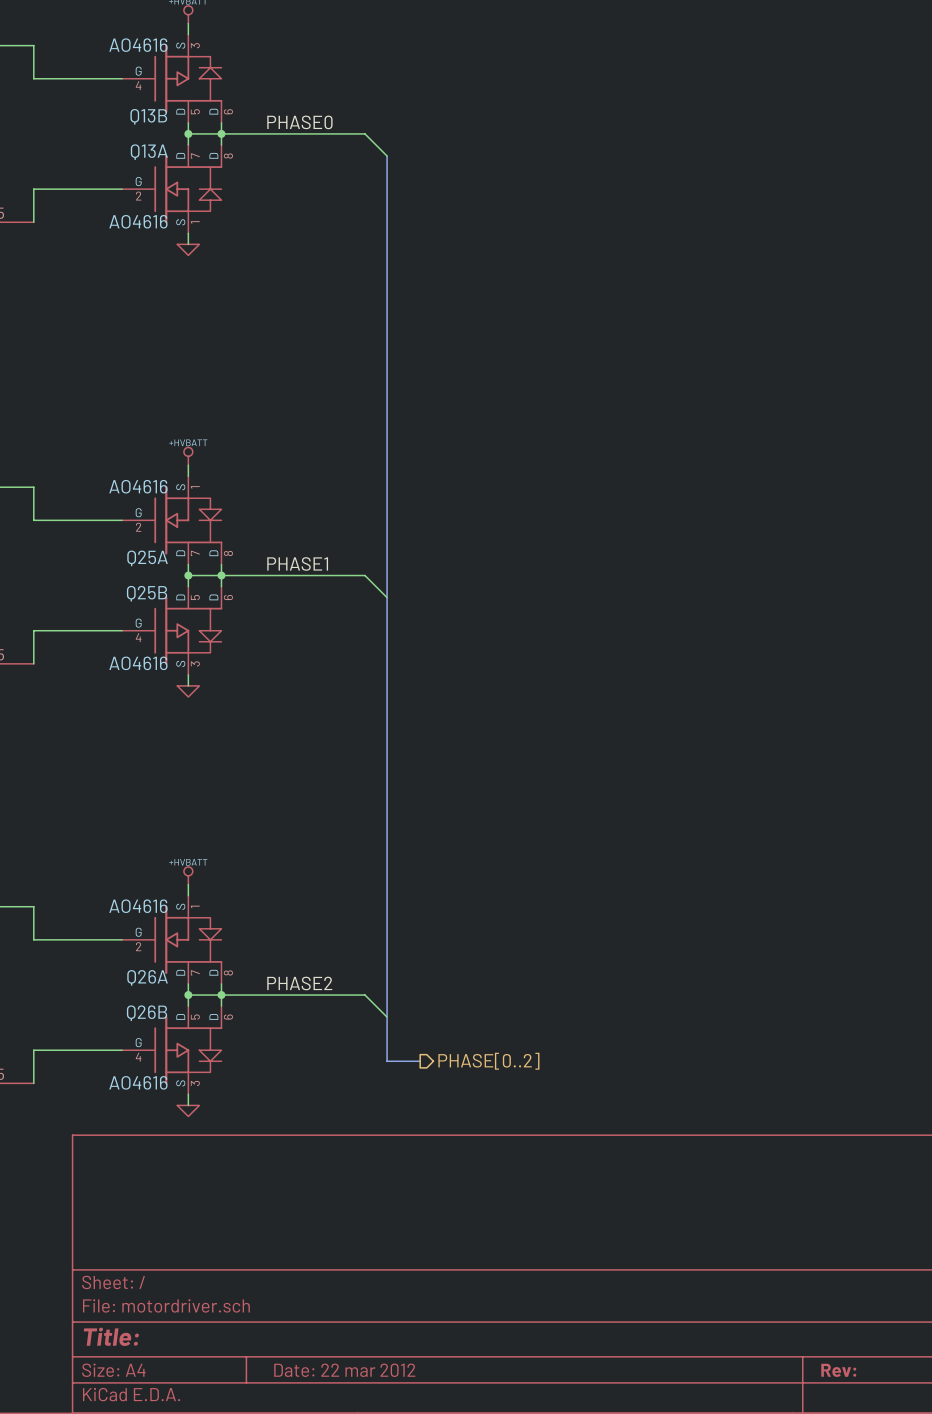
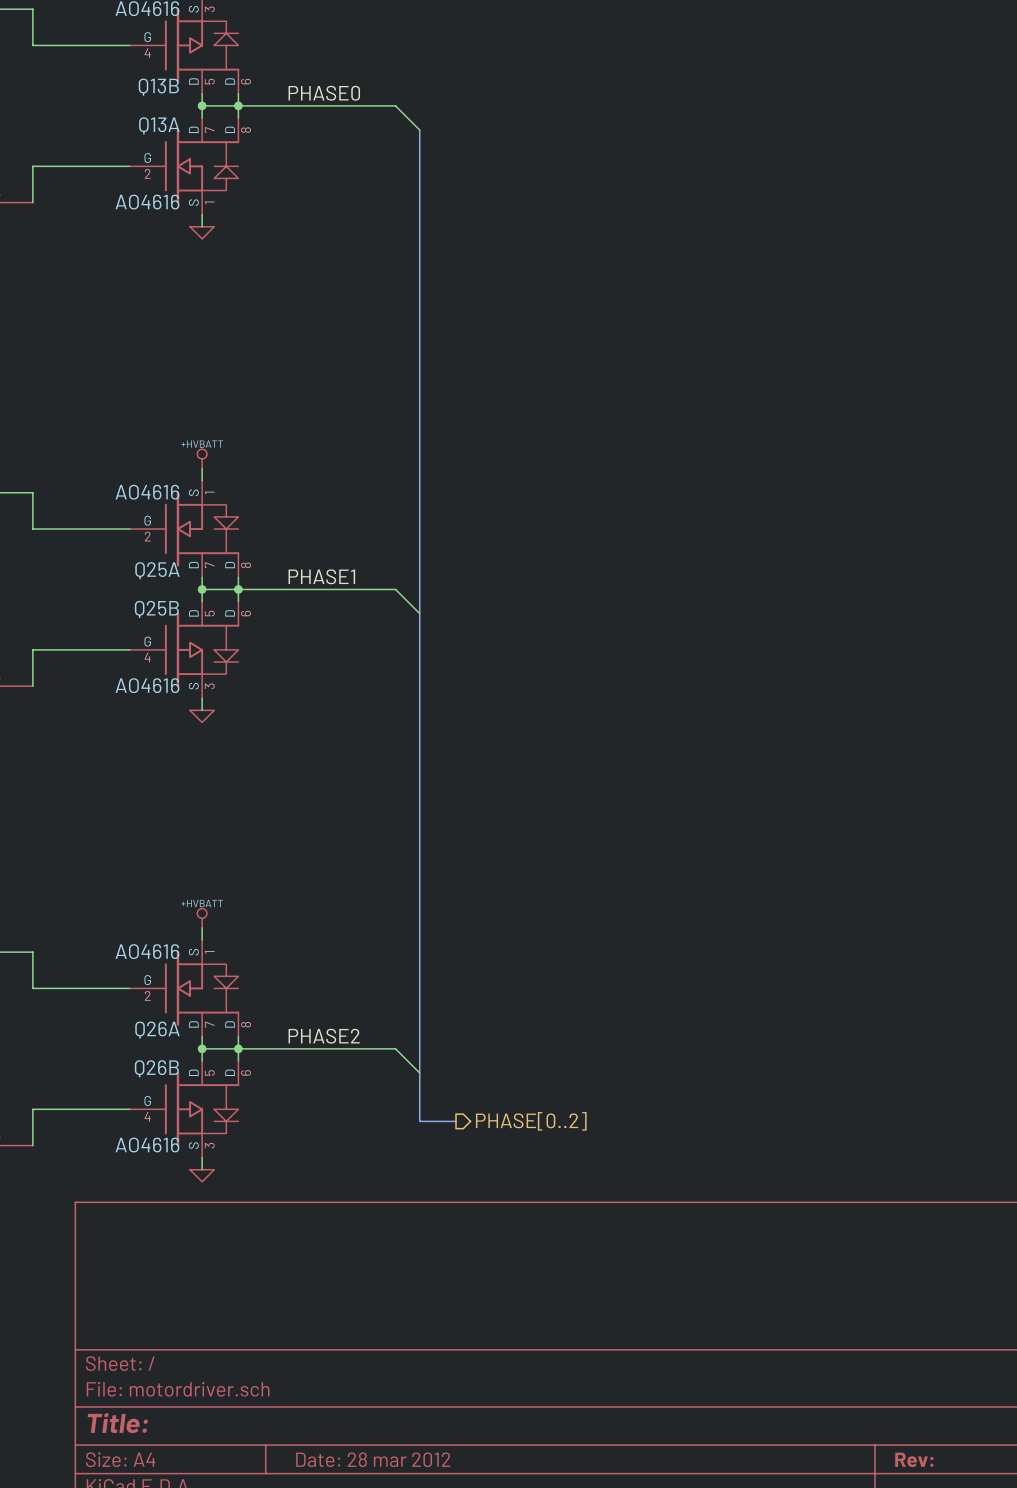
title block: Date: 22 mar 2012 (344, 1370) -> Date: 28 mar 2012 (373, 1459)

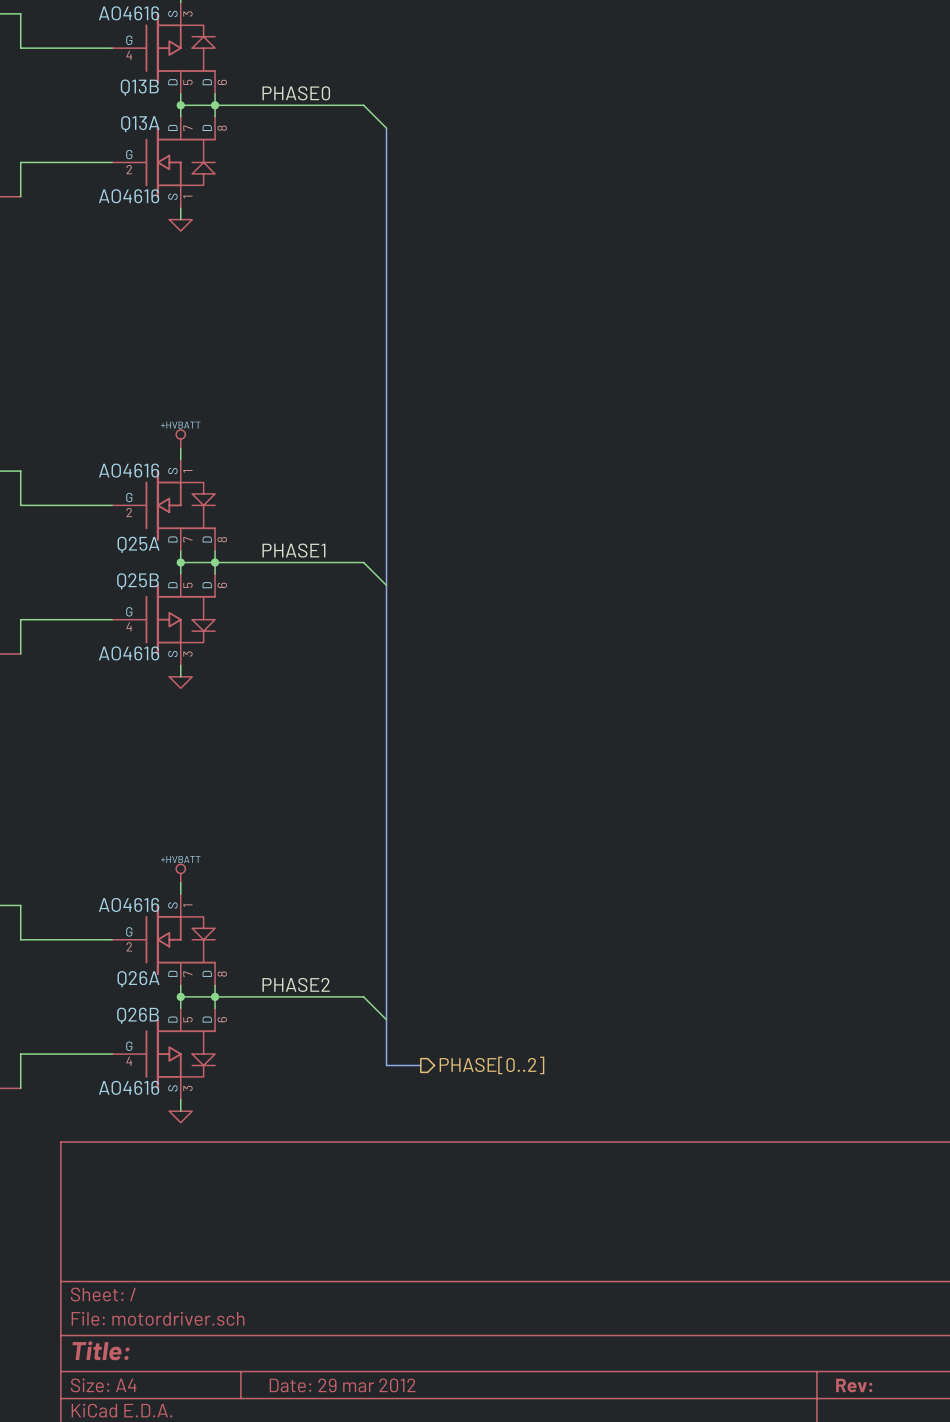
title block: Date: 28 mar 2012 (373, 1459) -> Date: 29 mar 2012 (342, 1385)

